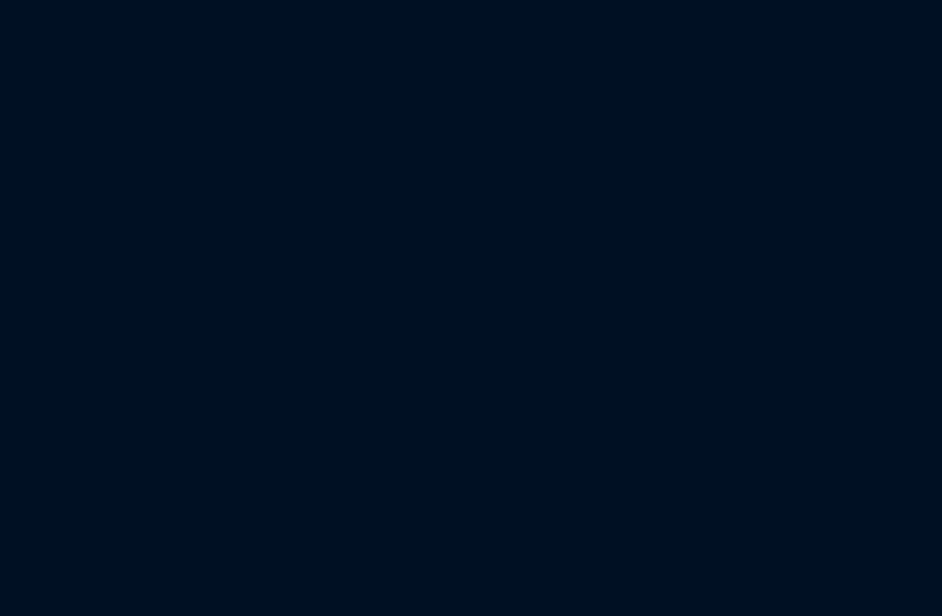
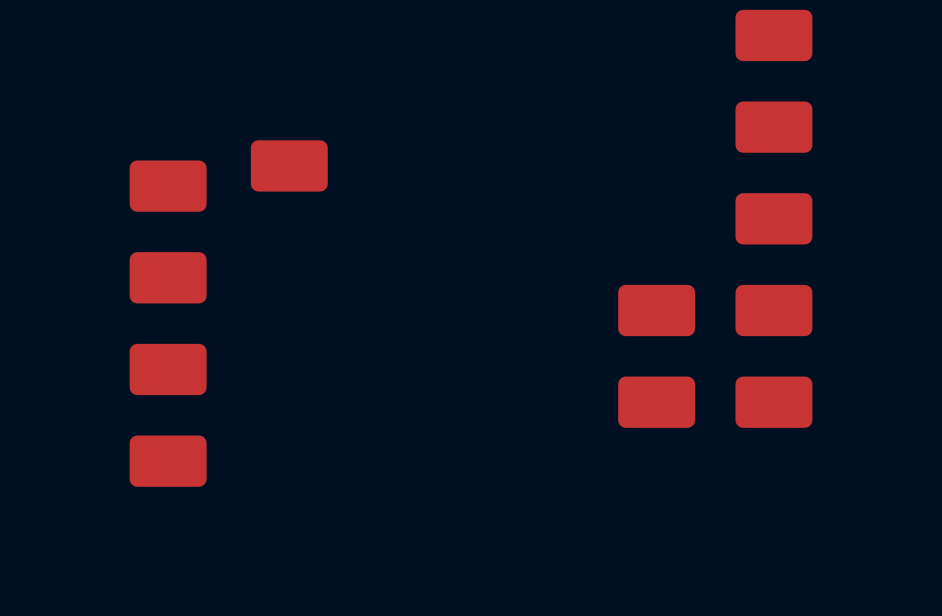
part: none -> (773, 35)
part: none -> (773, 127)
part: none -> (289, 165)
part: none -> (168, 186)
part: none -> (773, 218)
part: none -> (168, 277)
part: none -> (656, 310)
part: none -> (773, 310)
part: none -> (168, 369)
part: none -> (656, 402)
part: none -> (773, 402)
part: none -> (168, 461)

